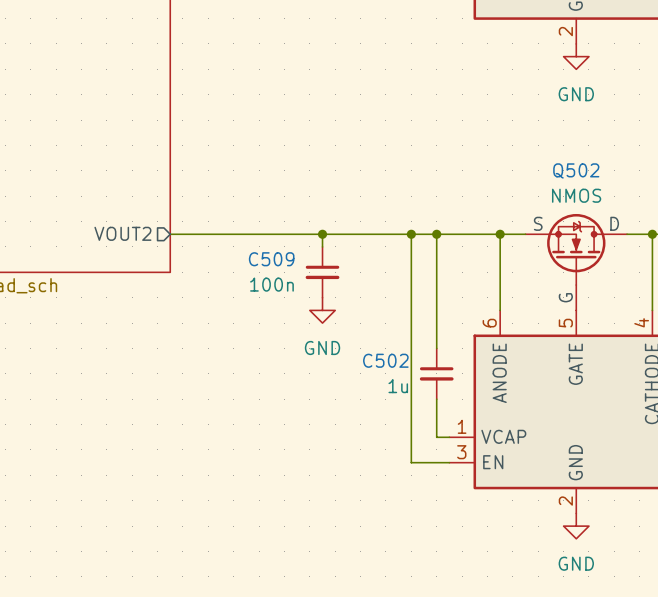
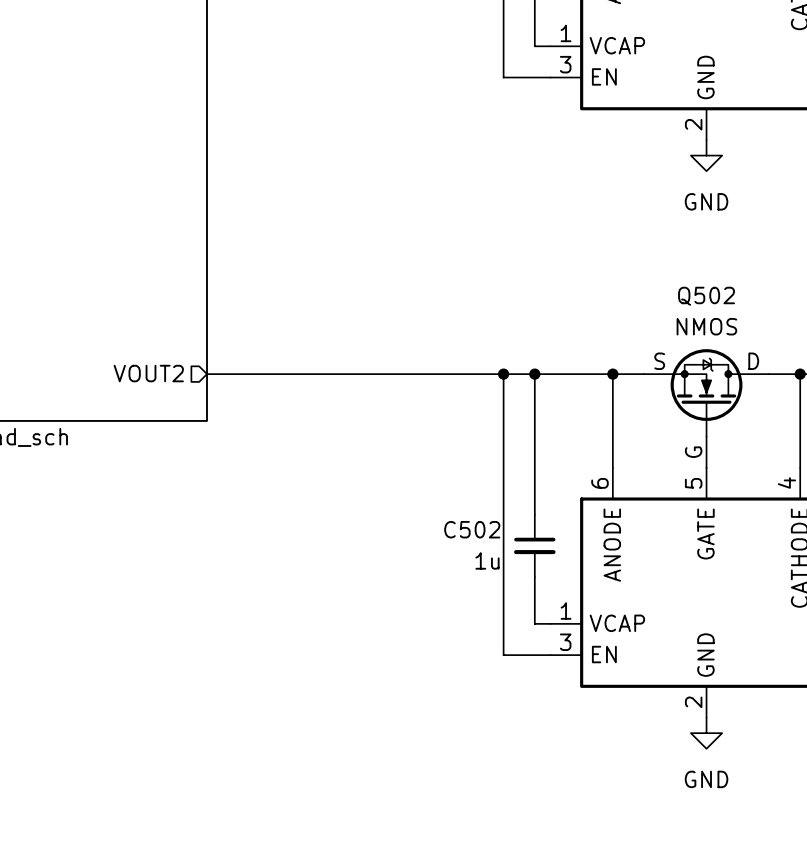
wire: (322, 234) (322, 246) -> none
junction: (322, 234) -> none
C509: 100n (322, 272) -> none
power symbol: GND (322, 310) -> none

